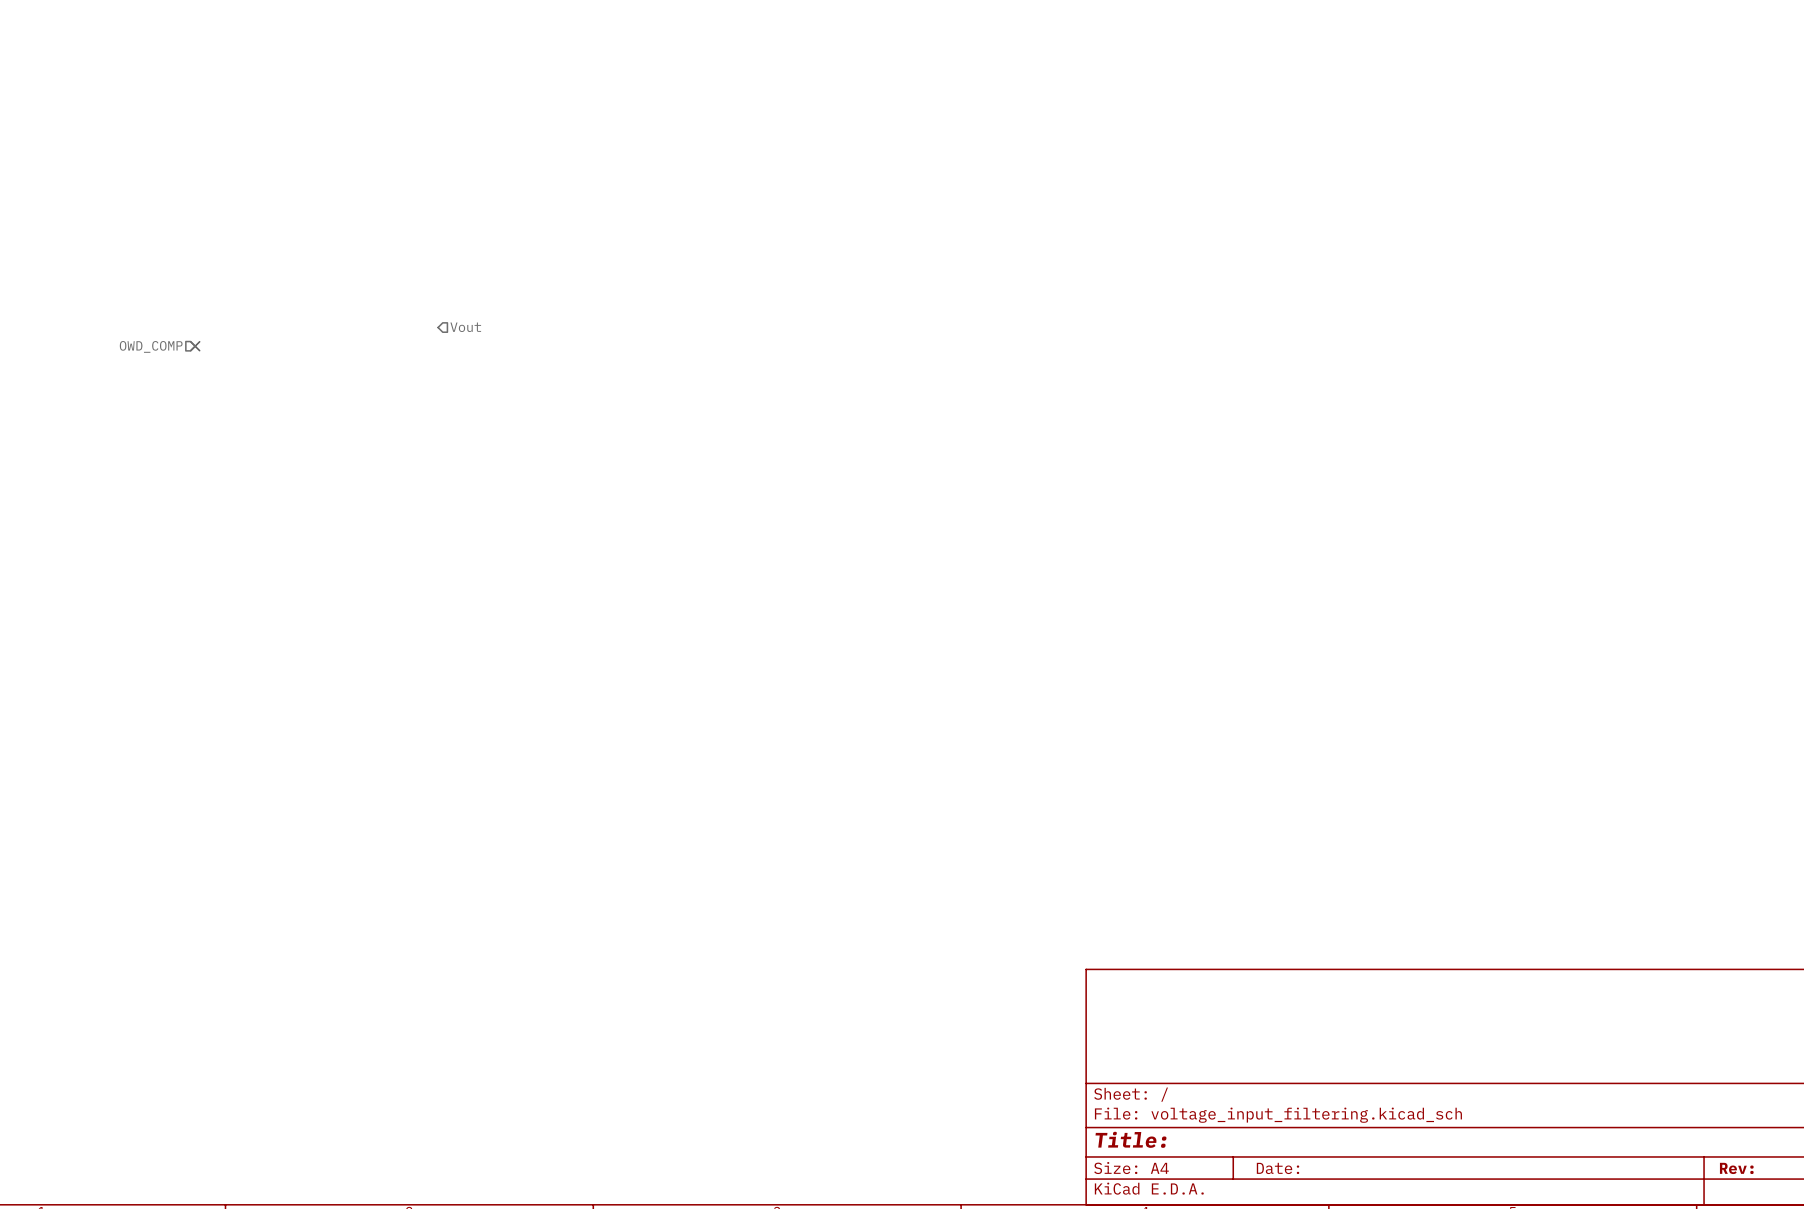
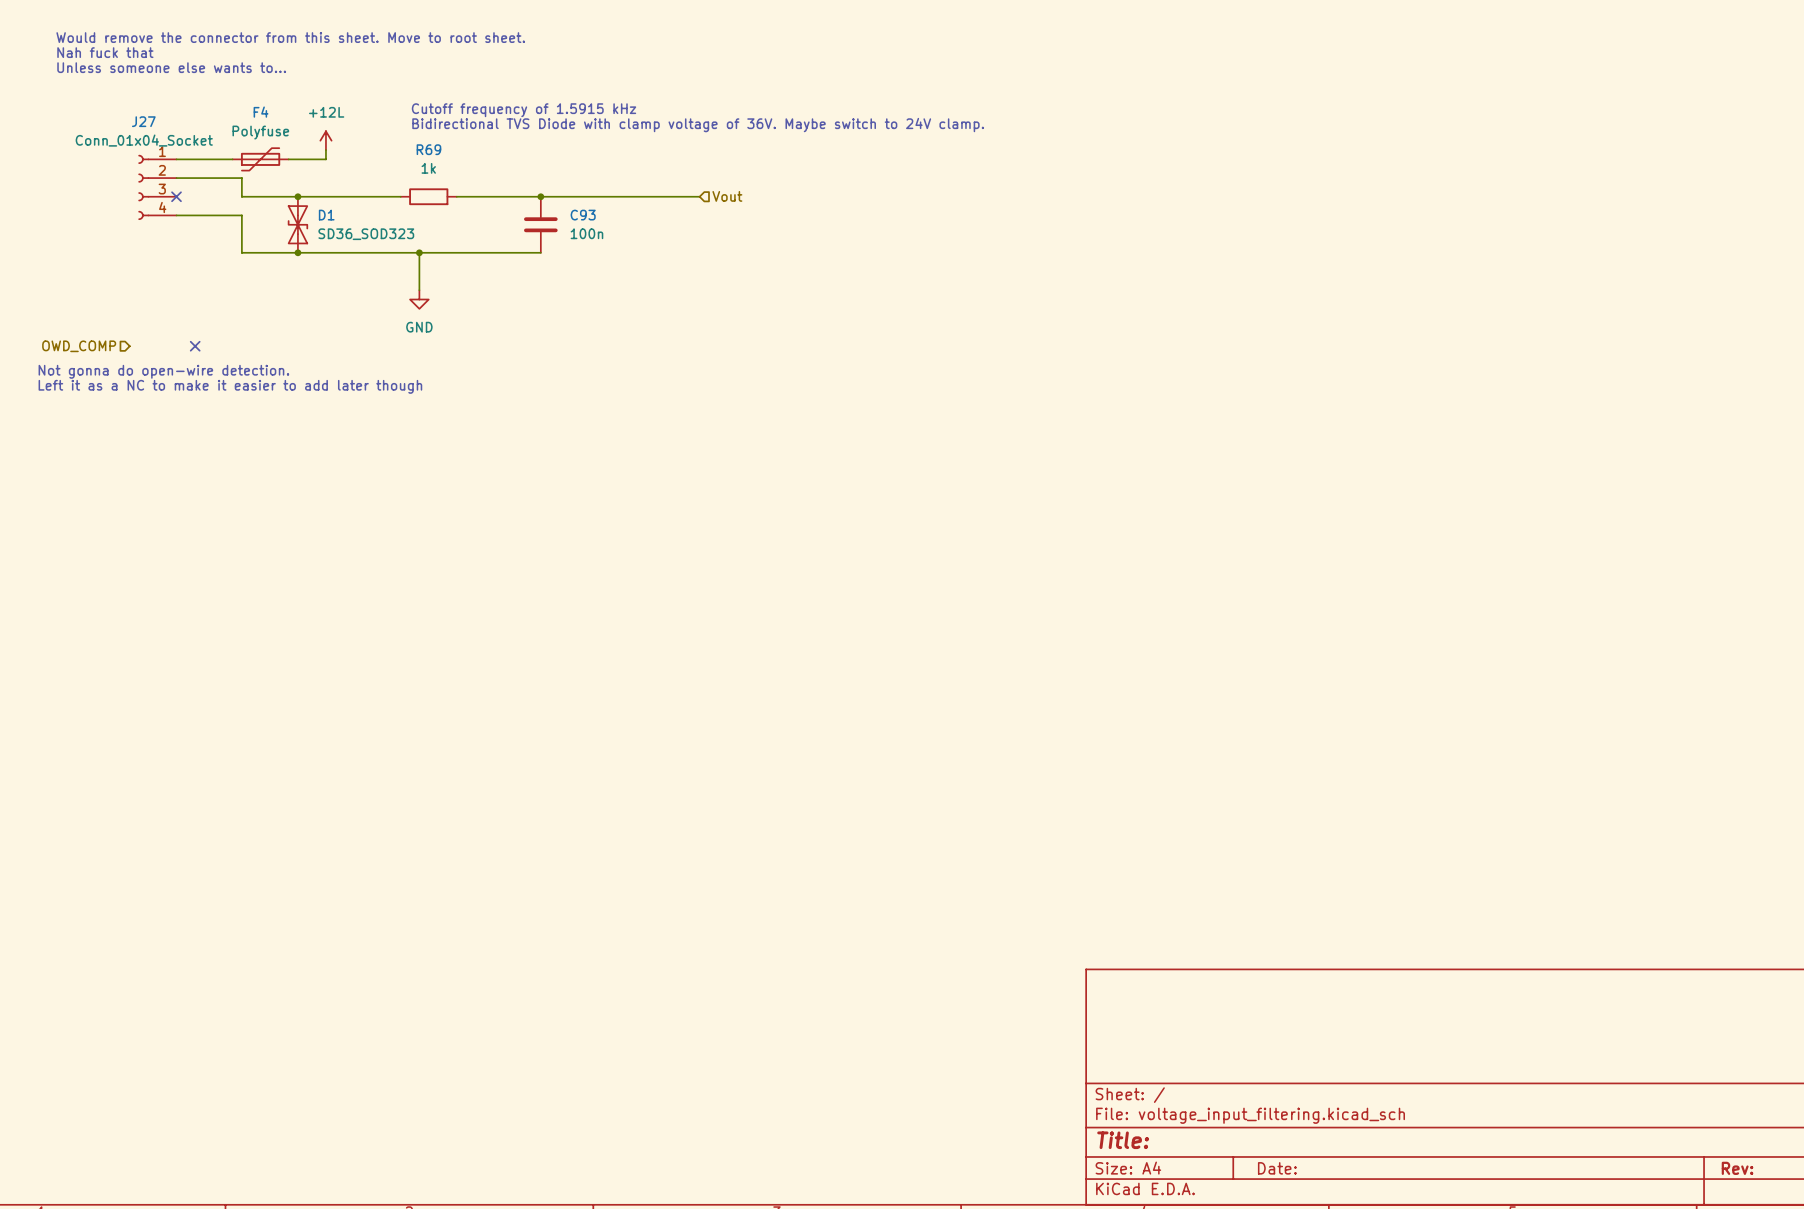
text: none -> Would remove the connector from this sheet. Move to root sheet. (290, 37)
text: none -> Nah fuck that (105, 52)
text: none -> Unless someone else wants to... (171, 67)
text: none -> Cutoff frequency of 1.5915 kHz (524, 110)
text: none -> Bidirectional TVS Diode with clamp voltage of 36V. Maybe switch to 24V clamp. (698, 125)
power symbol: none -> +12L (325, 140)
wire: none -> (325, 150) (325, 159) (288, 159)
wire: none -> (176, 159) (232, 159)
F4: none -> Polyfuse (260, 159)
wire: none -> (176, 178) (241, 178) (241, 196) (400, 196)
J27: none -> Conn_01x04_Socket (157, 187)
no-connect mark: none -> (176, 196)
junction: none -> (297, 196)
R69: none -> 1k (428, 196)
wire: none -> (456, 196) (699, 196)
junction: none -> (540, 196)
hierarchical label: none -> Vout (727, 196)
wire: none -> (176, 215) (241, 215) (241, 252) (540, 252)
D1: none -> SD36_SOD323 (297, 224)
C93: none -> 100n (540, 224)
junction: none -> (297, 252)
wire: none -> (419, 252) (419, 290)
junction: none -> (419, 252)
power symbol: none -> GND (419, 299)
hierarchical label: Vout (465, 327) -> none
hierarchical label position: OWD_COMP (151, 346) -> OWD_COMP (79, 346)
text: none -> Not gonna do open-wire detection. (163, 371)
text: none -> Left it as a NC to make it easier to add later though (230, 386)

